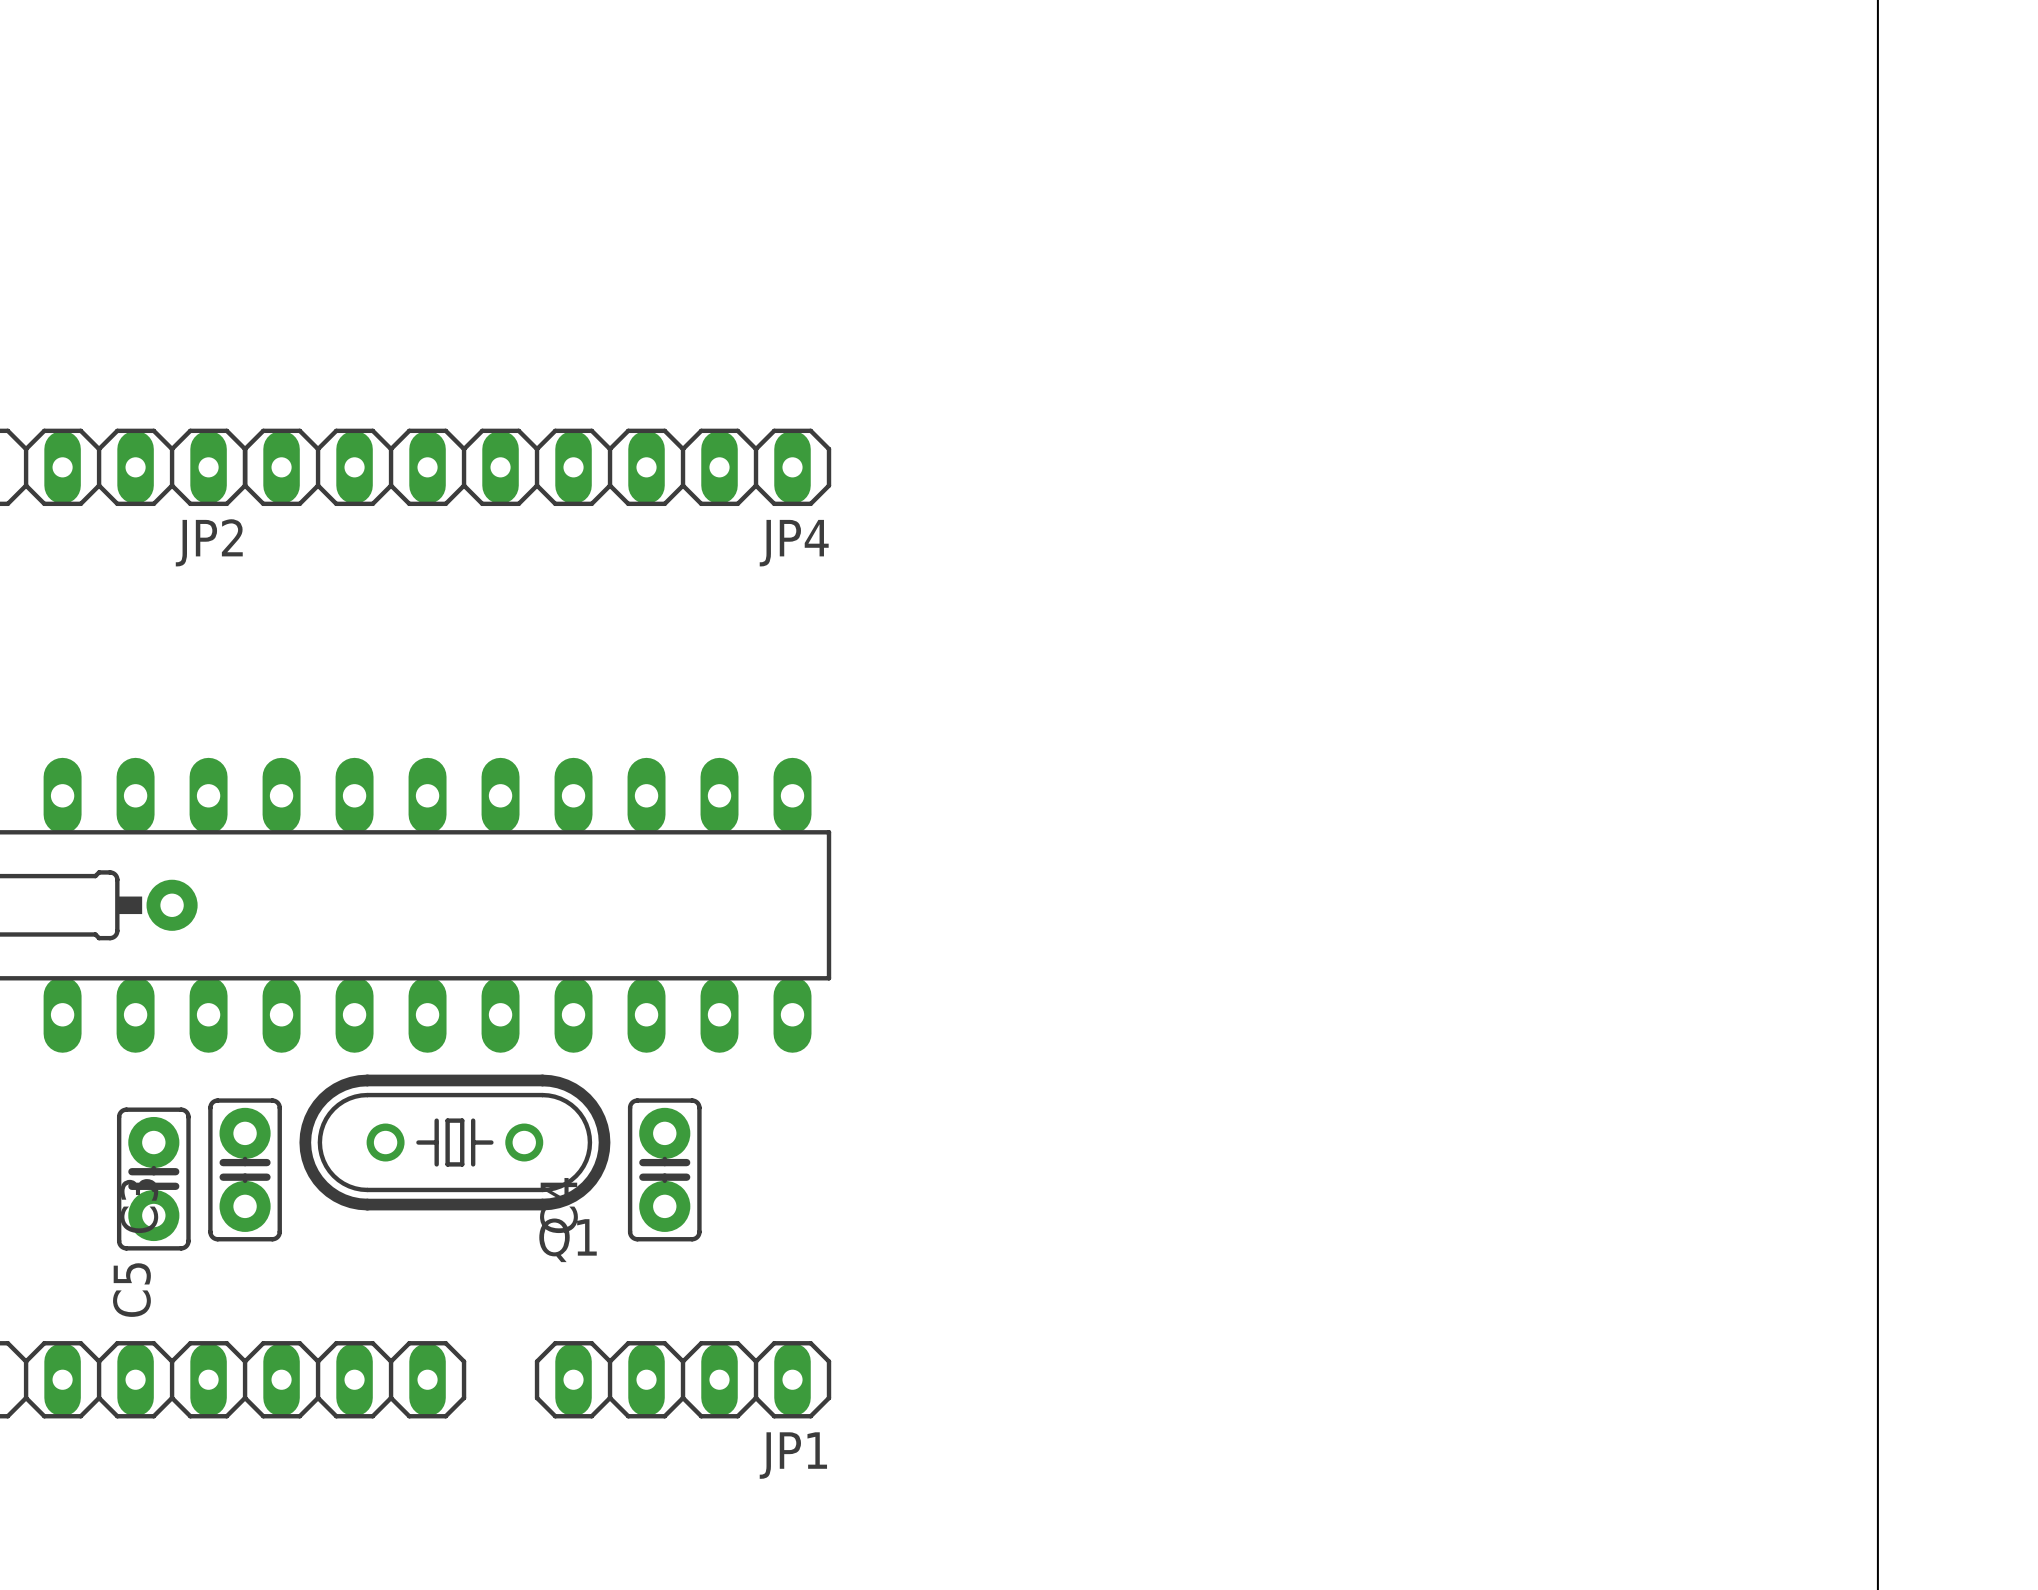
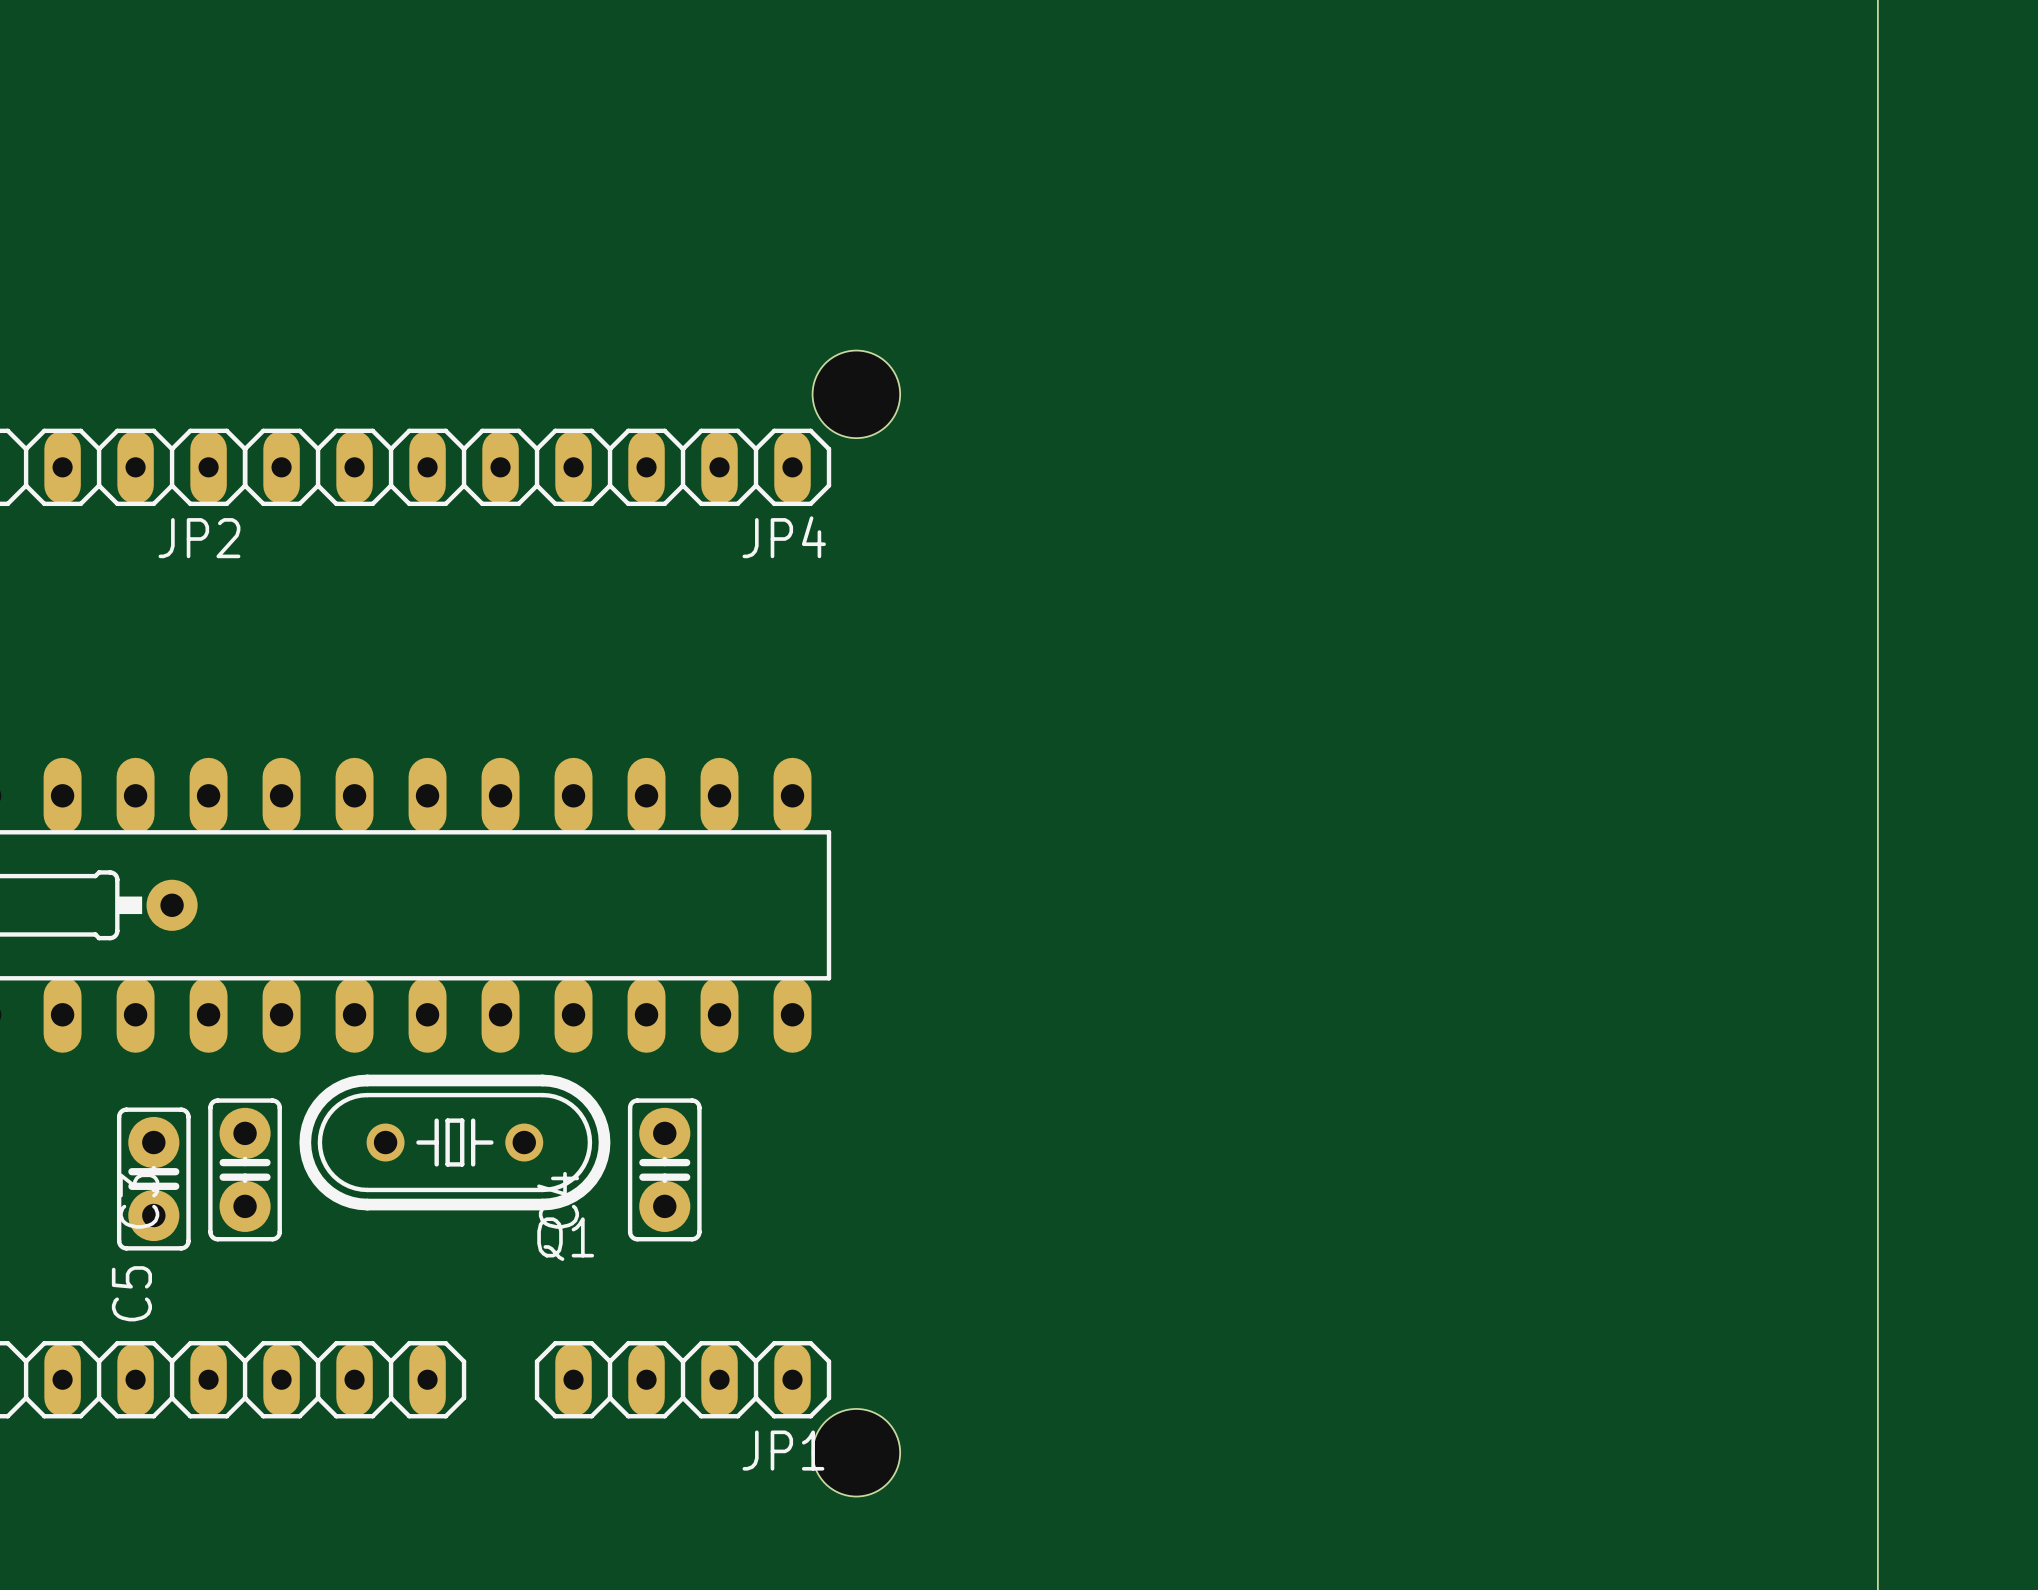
hole: none -> (856, 394)
hole: none -> (856, 1452)

